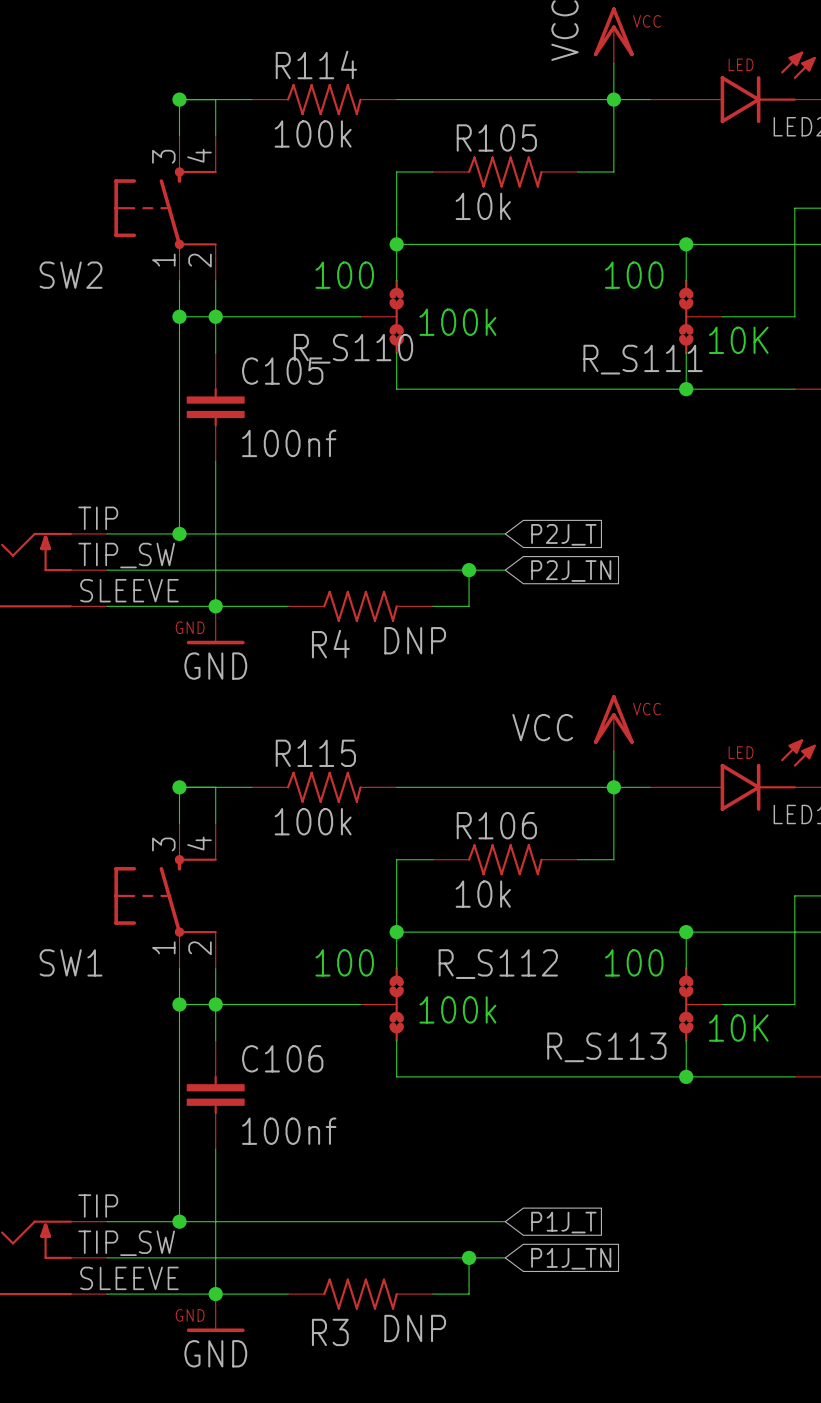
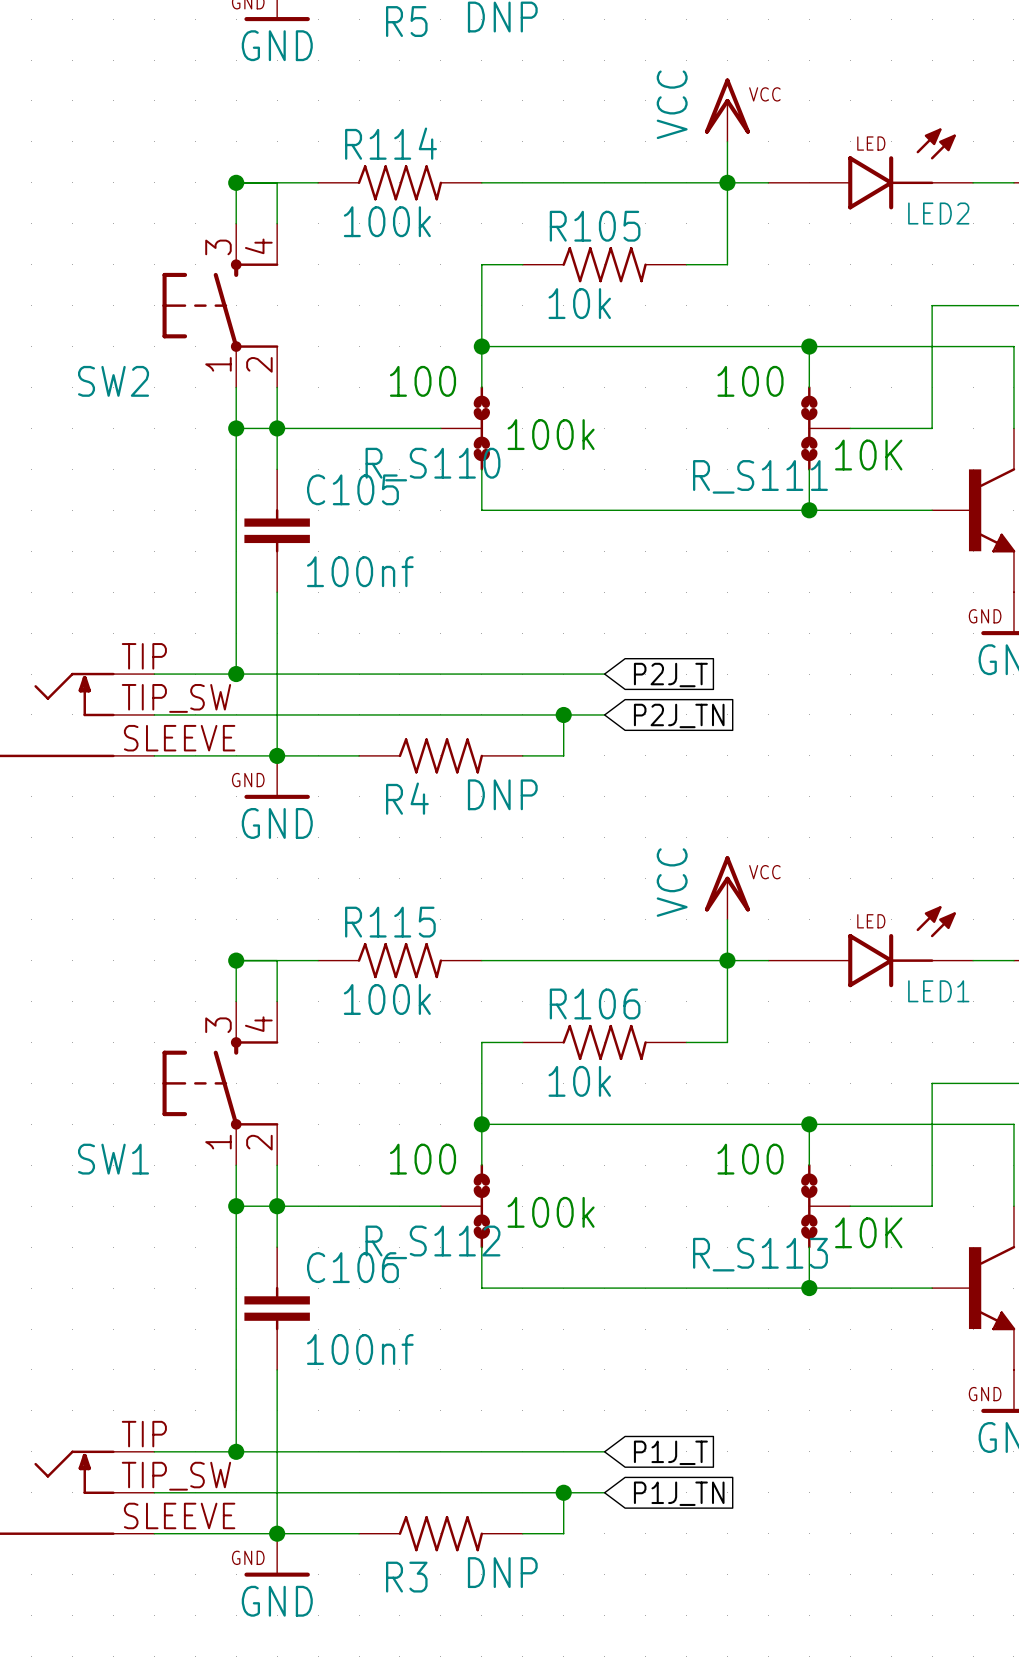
power symbol text rotation: 0° (542, 727) -> 90° counterclockwise (672, 882)
R_S112 name position: R_S112 (498, 964) -> R_S112 (432, 1242)
R_S113 name position: R_S113 (606, 1047) -> R_S113 (760, 1254)

